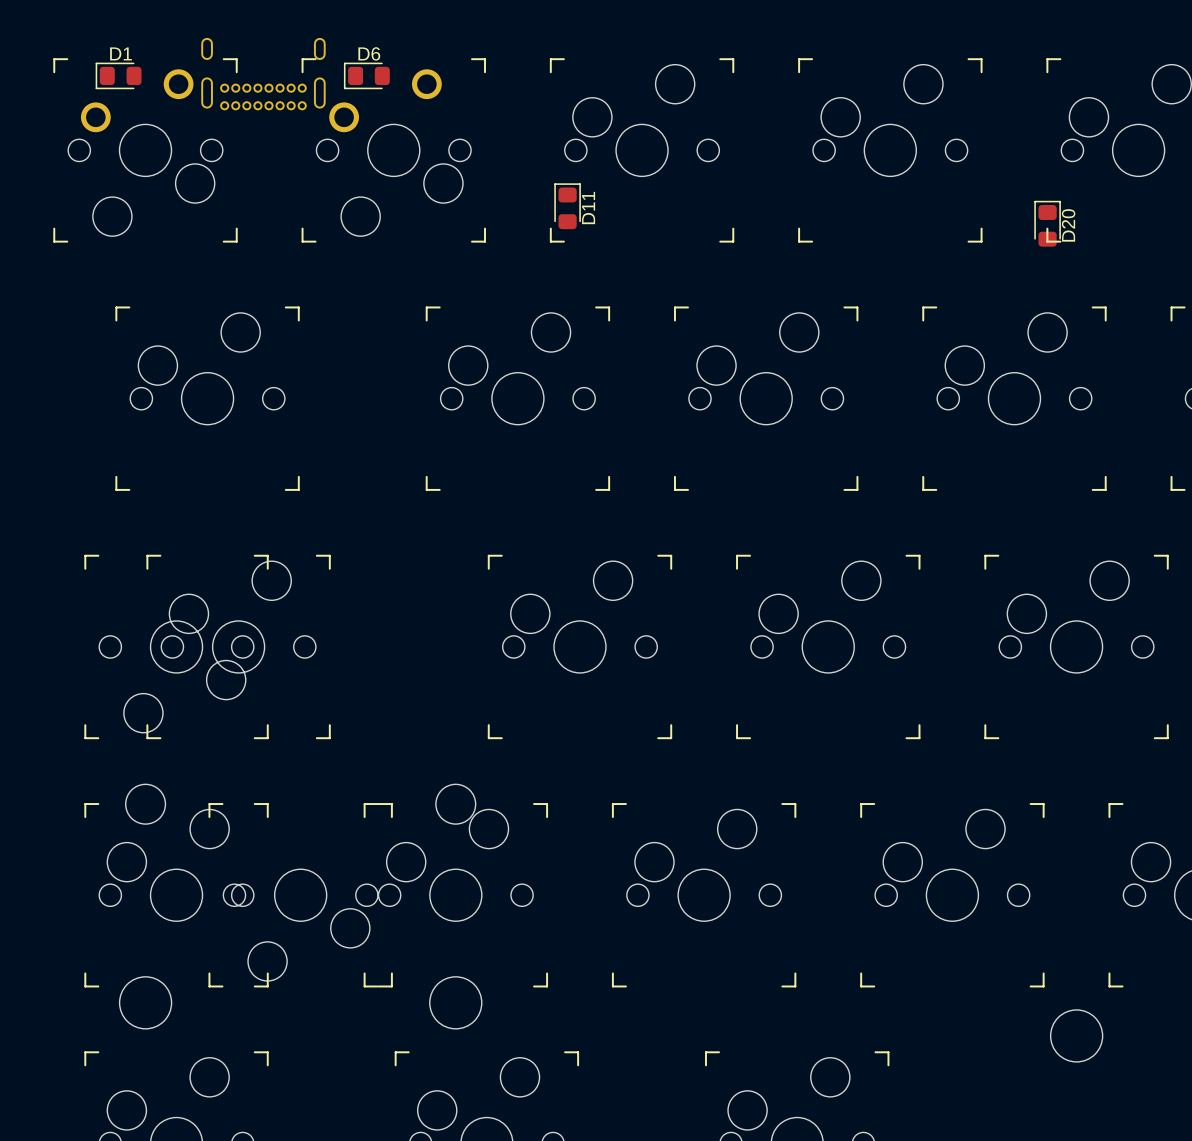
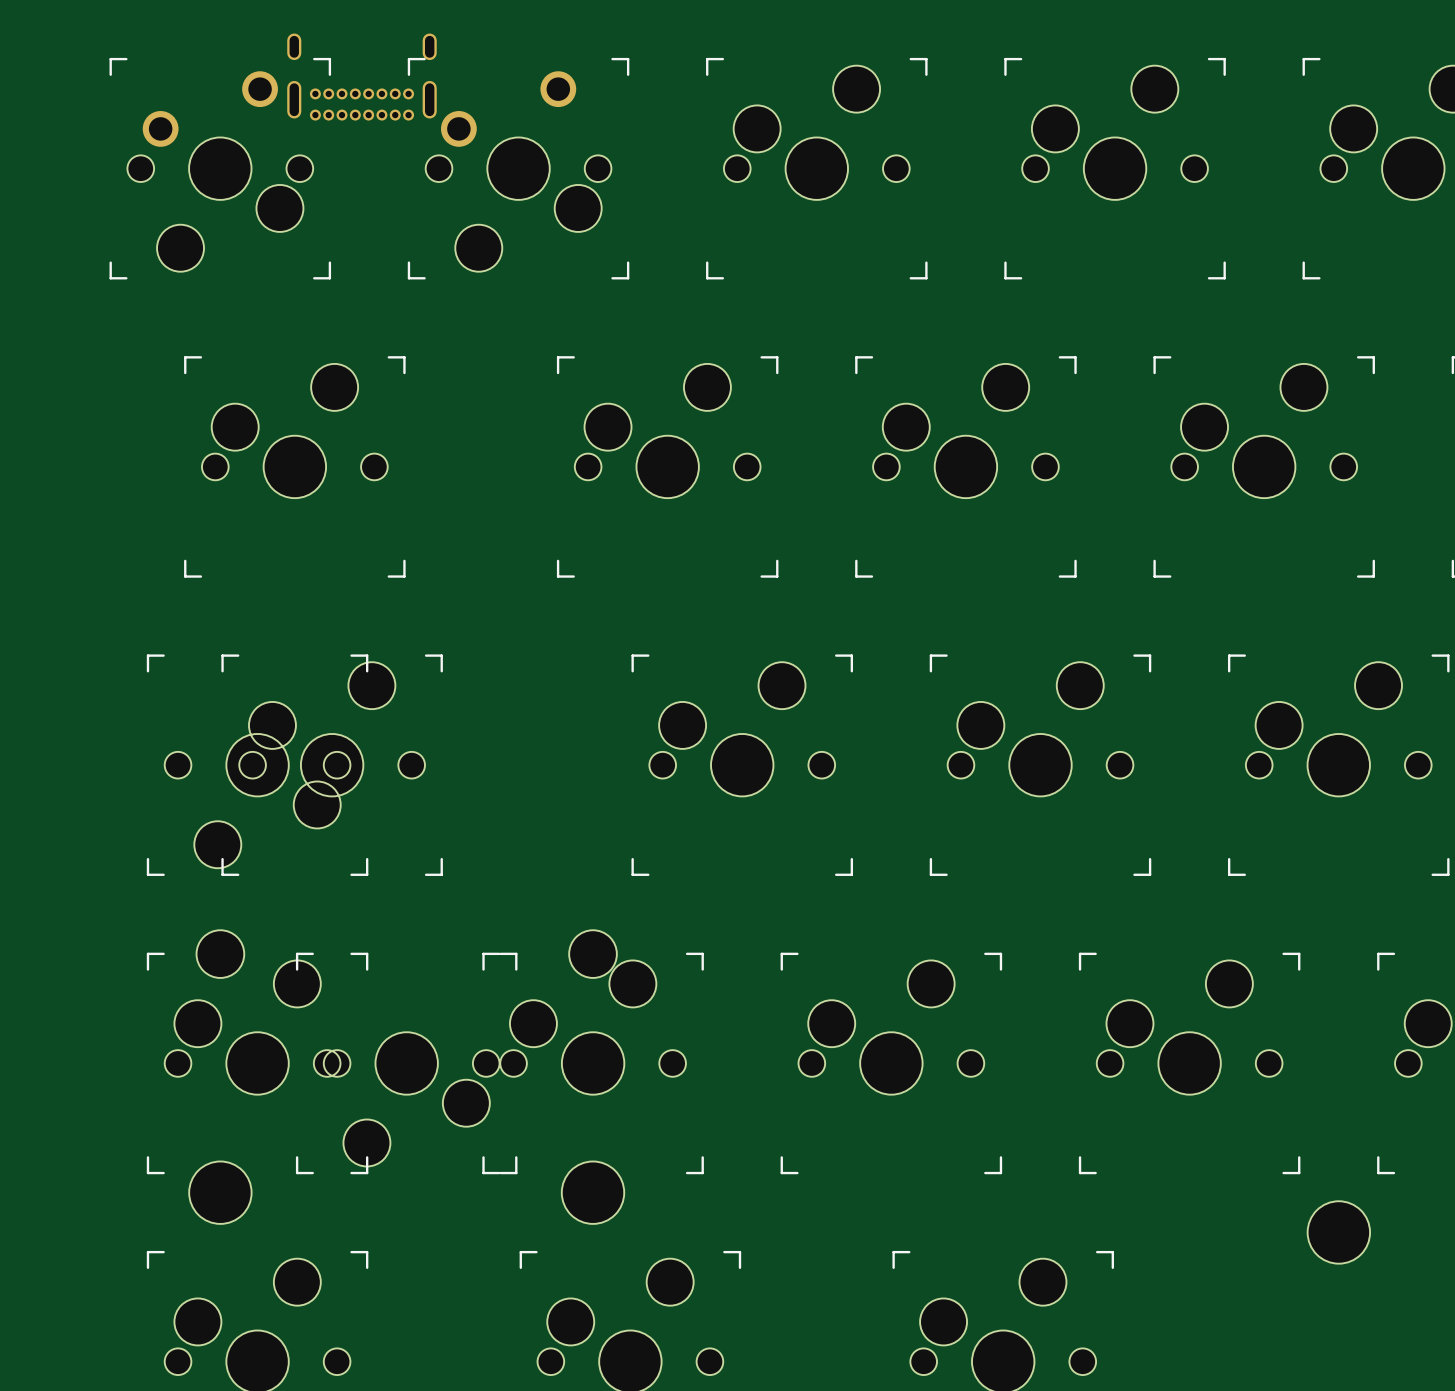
D1: (118, 75) -> none
D6: (366, 75) -> none
D11: (567, 206) -> none
D20: (1047, 223) -> none

